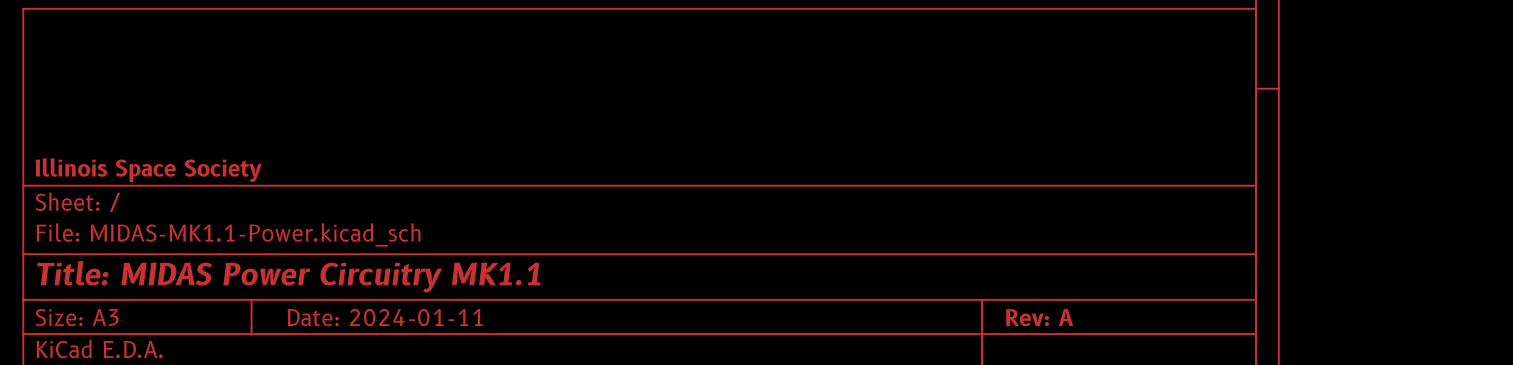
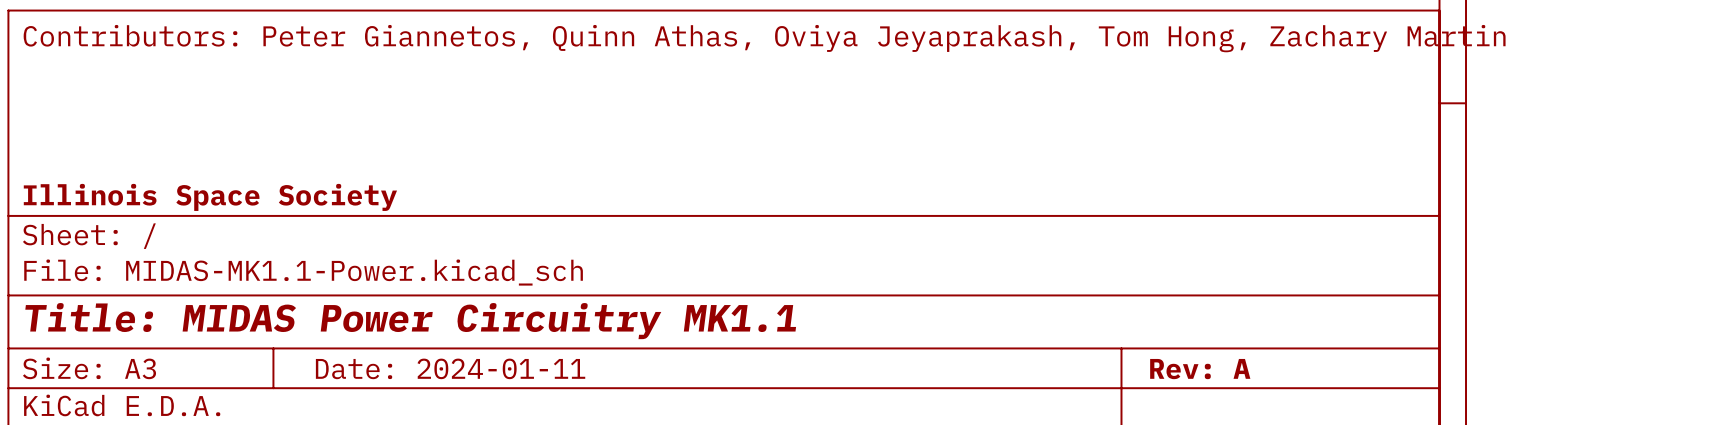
title block: none -> Contributors: Peter Giannetos, Quinn Athas, Oviya Jeyaprakash, Tom Hong, Zachary Martin (764, 38)

